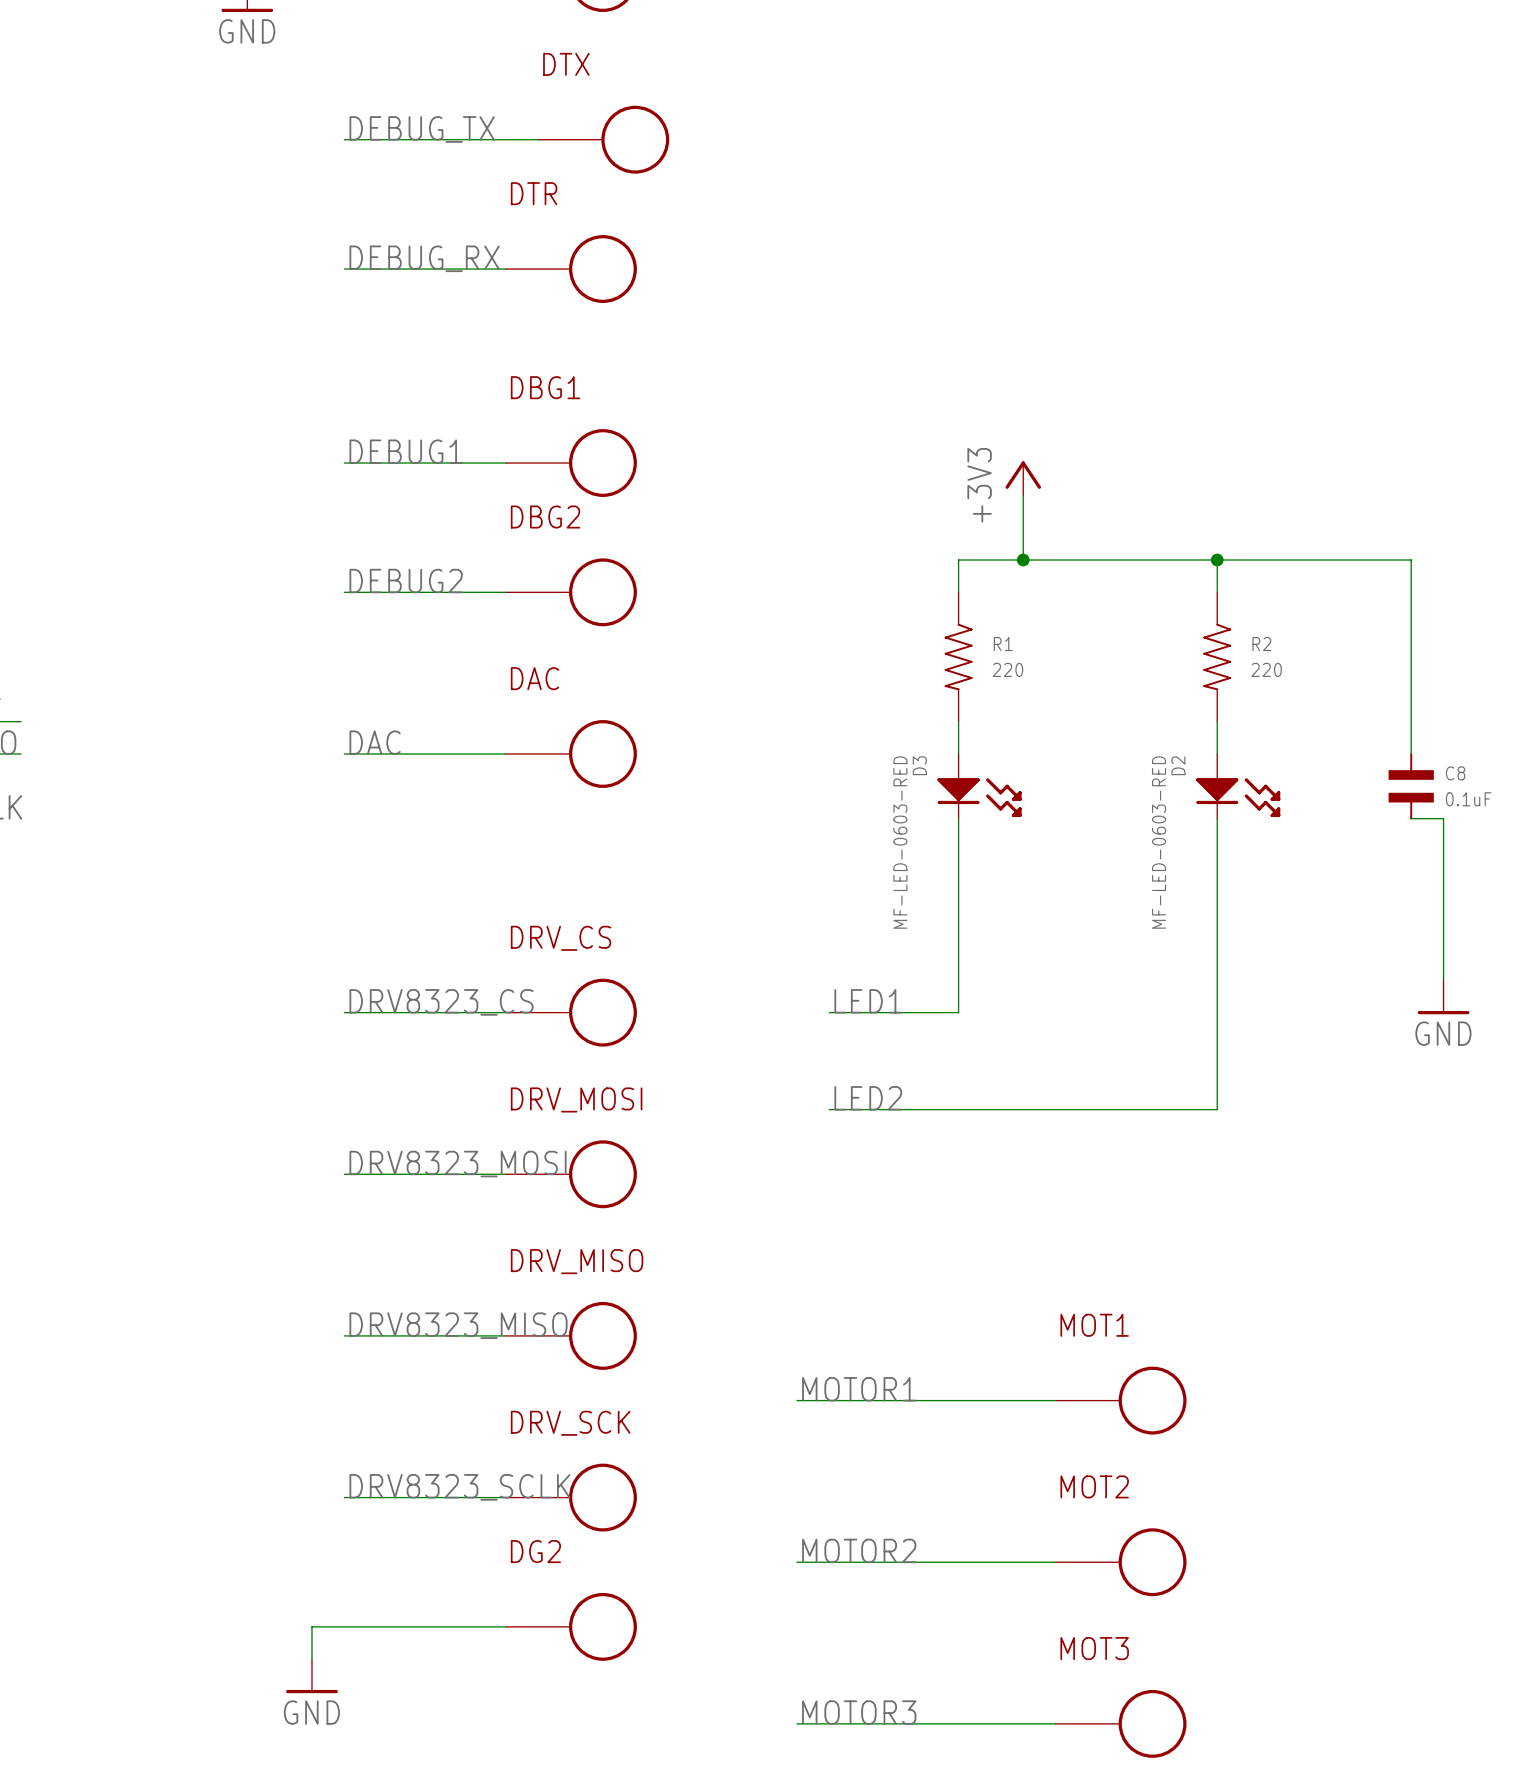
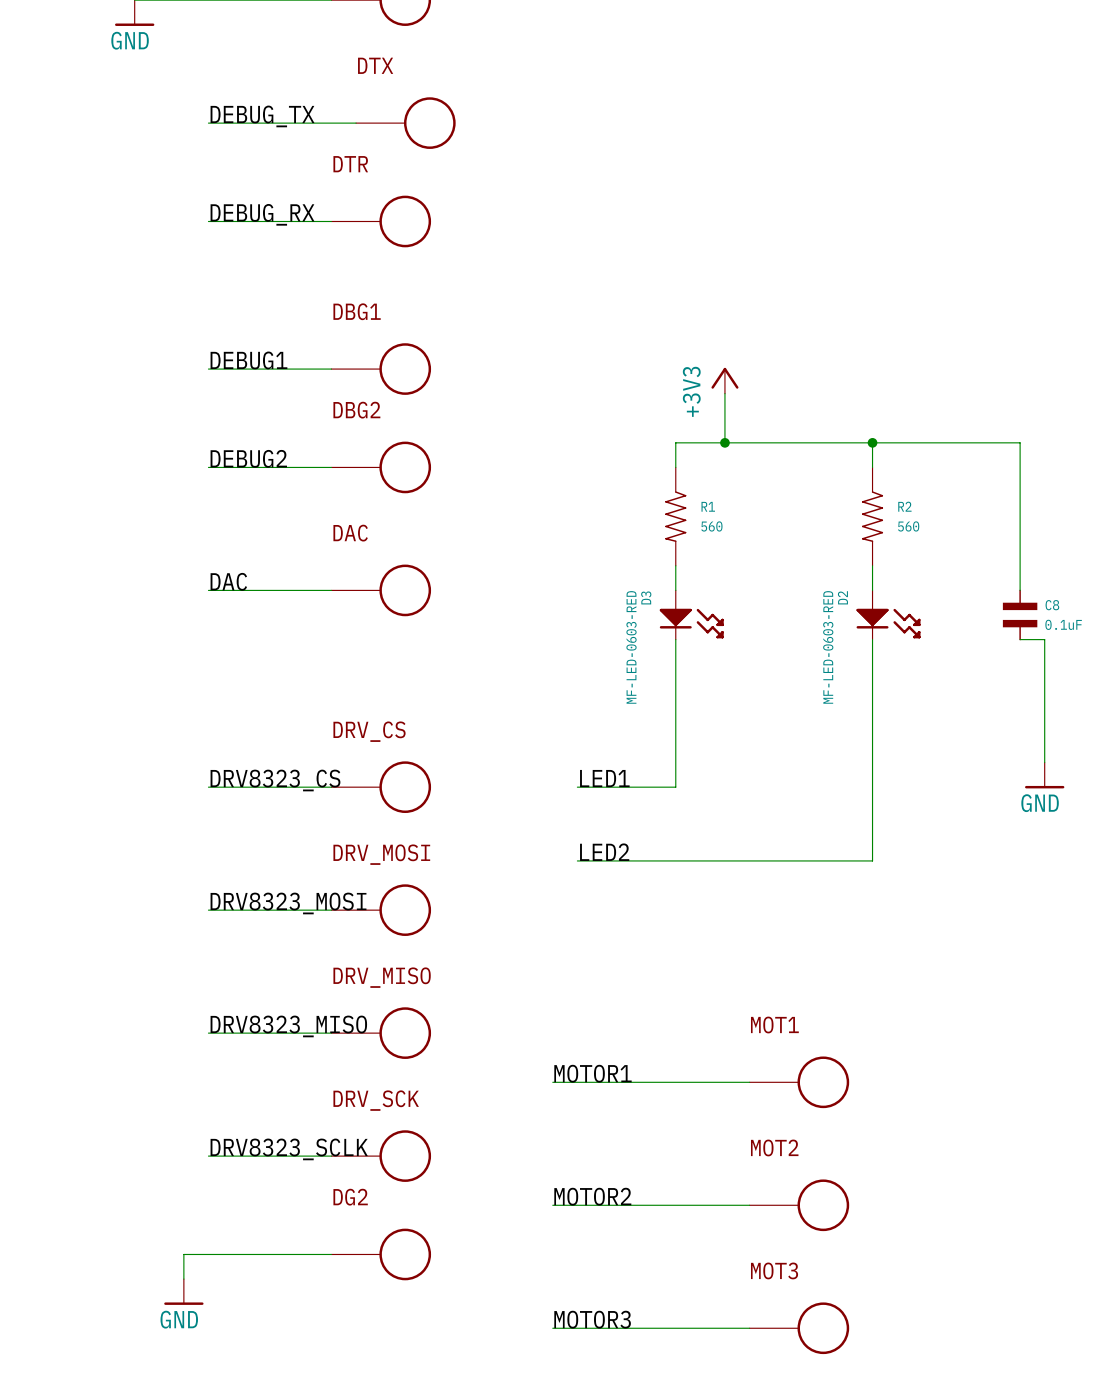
R1 value: 220 (1007, 669) -> 560 (711, 526)
R2 value: 220 (1266, 669) -> 560 (908, 526)

